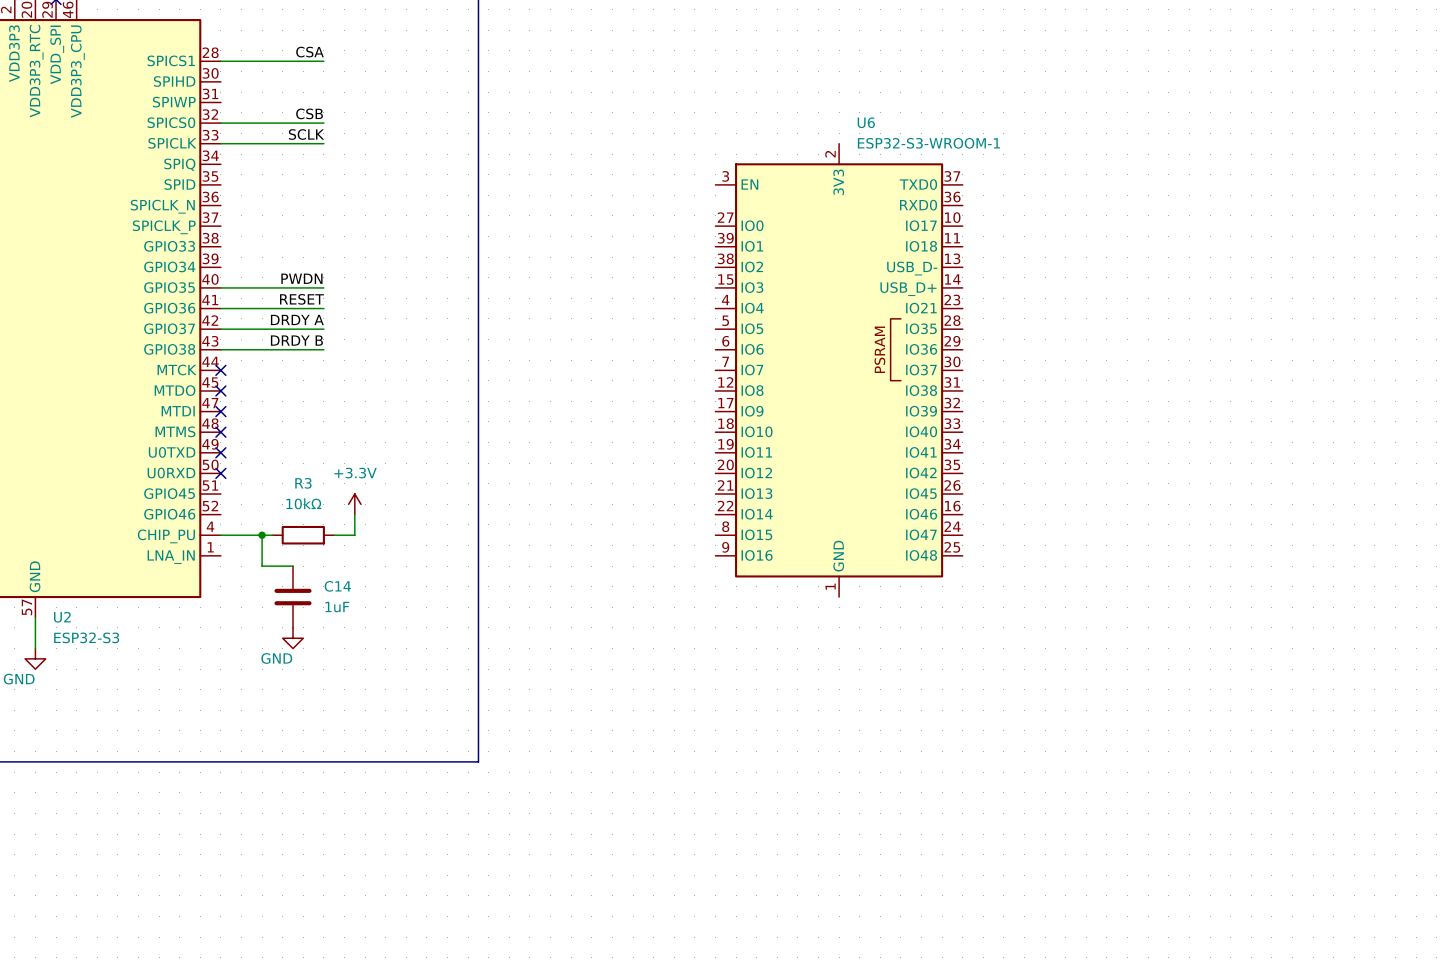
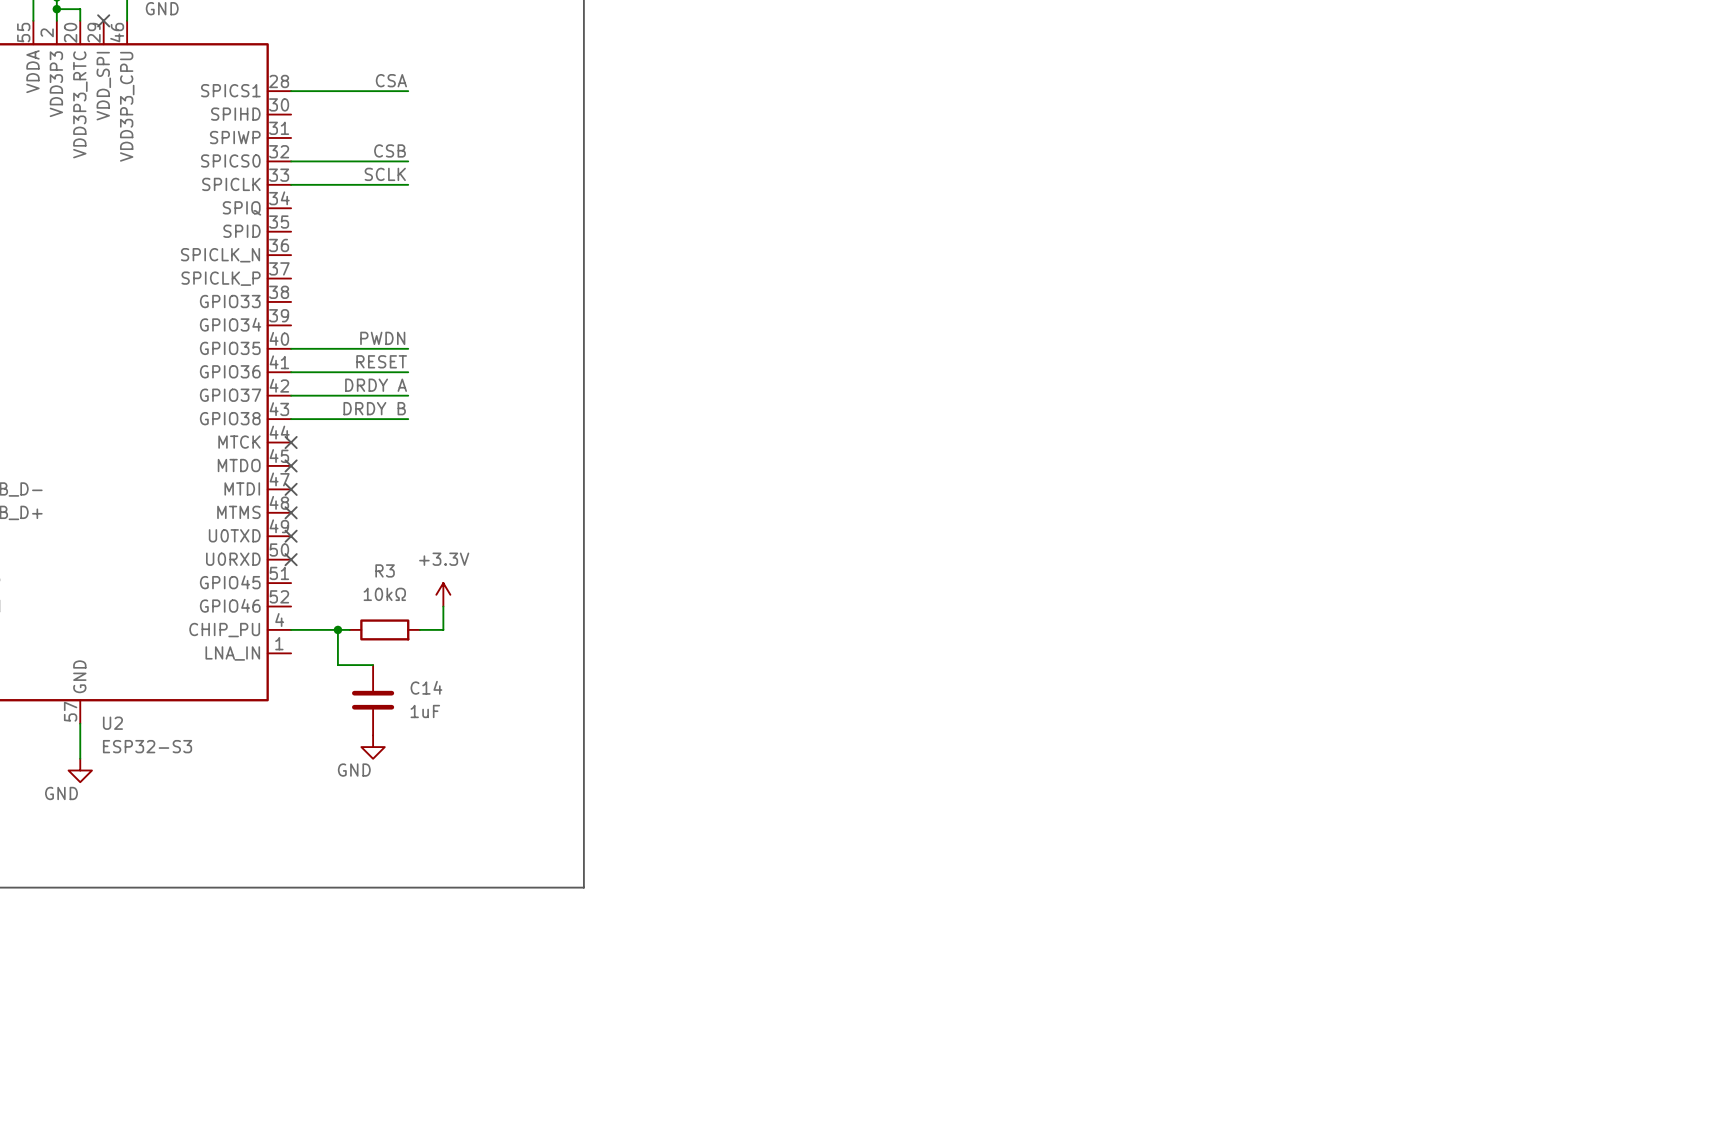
U6: ESP32-S3-WROOM-1 (839, 370) -> none

